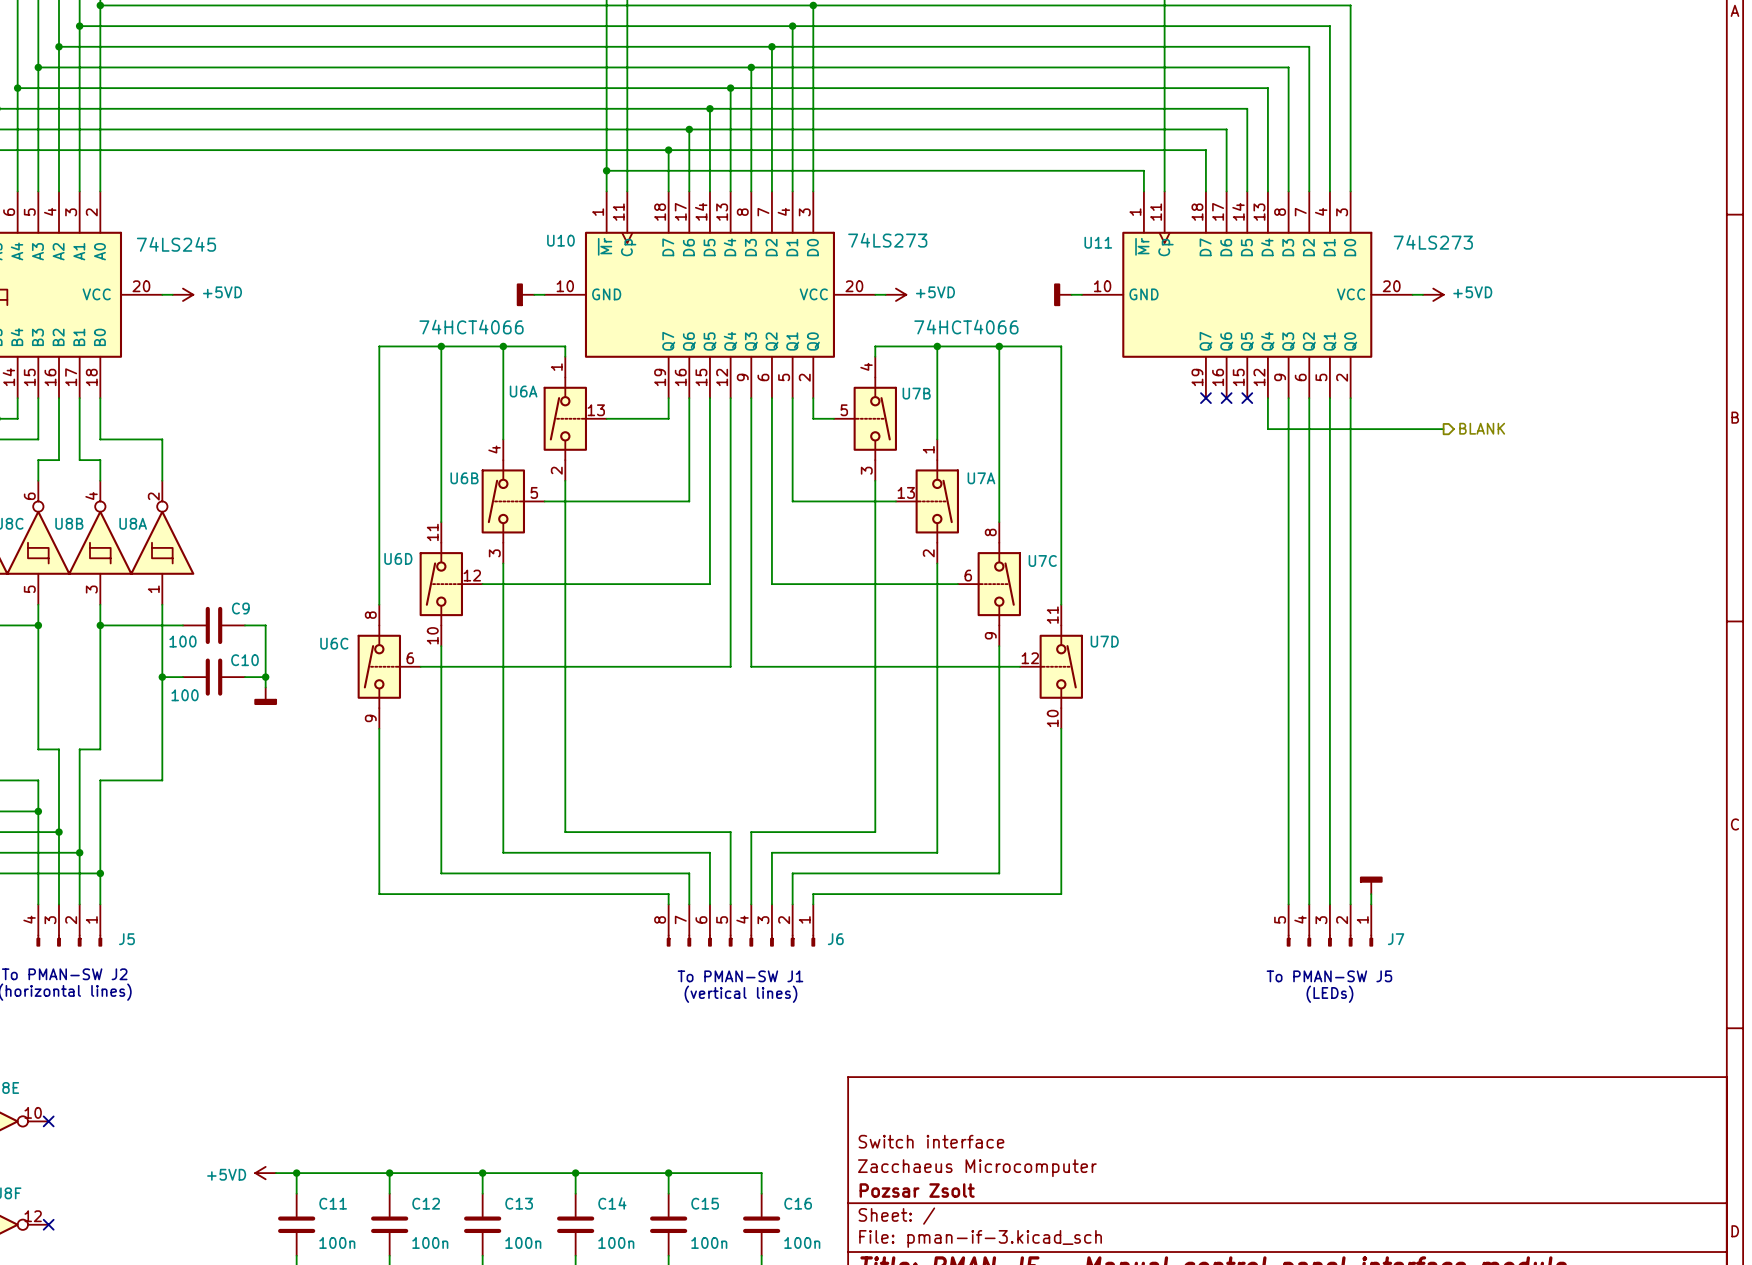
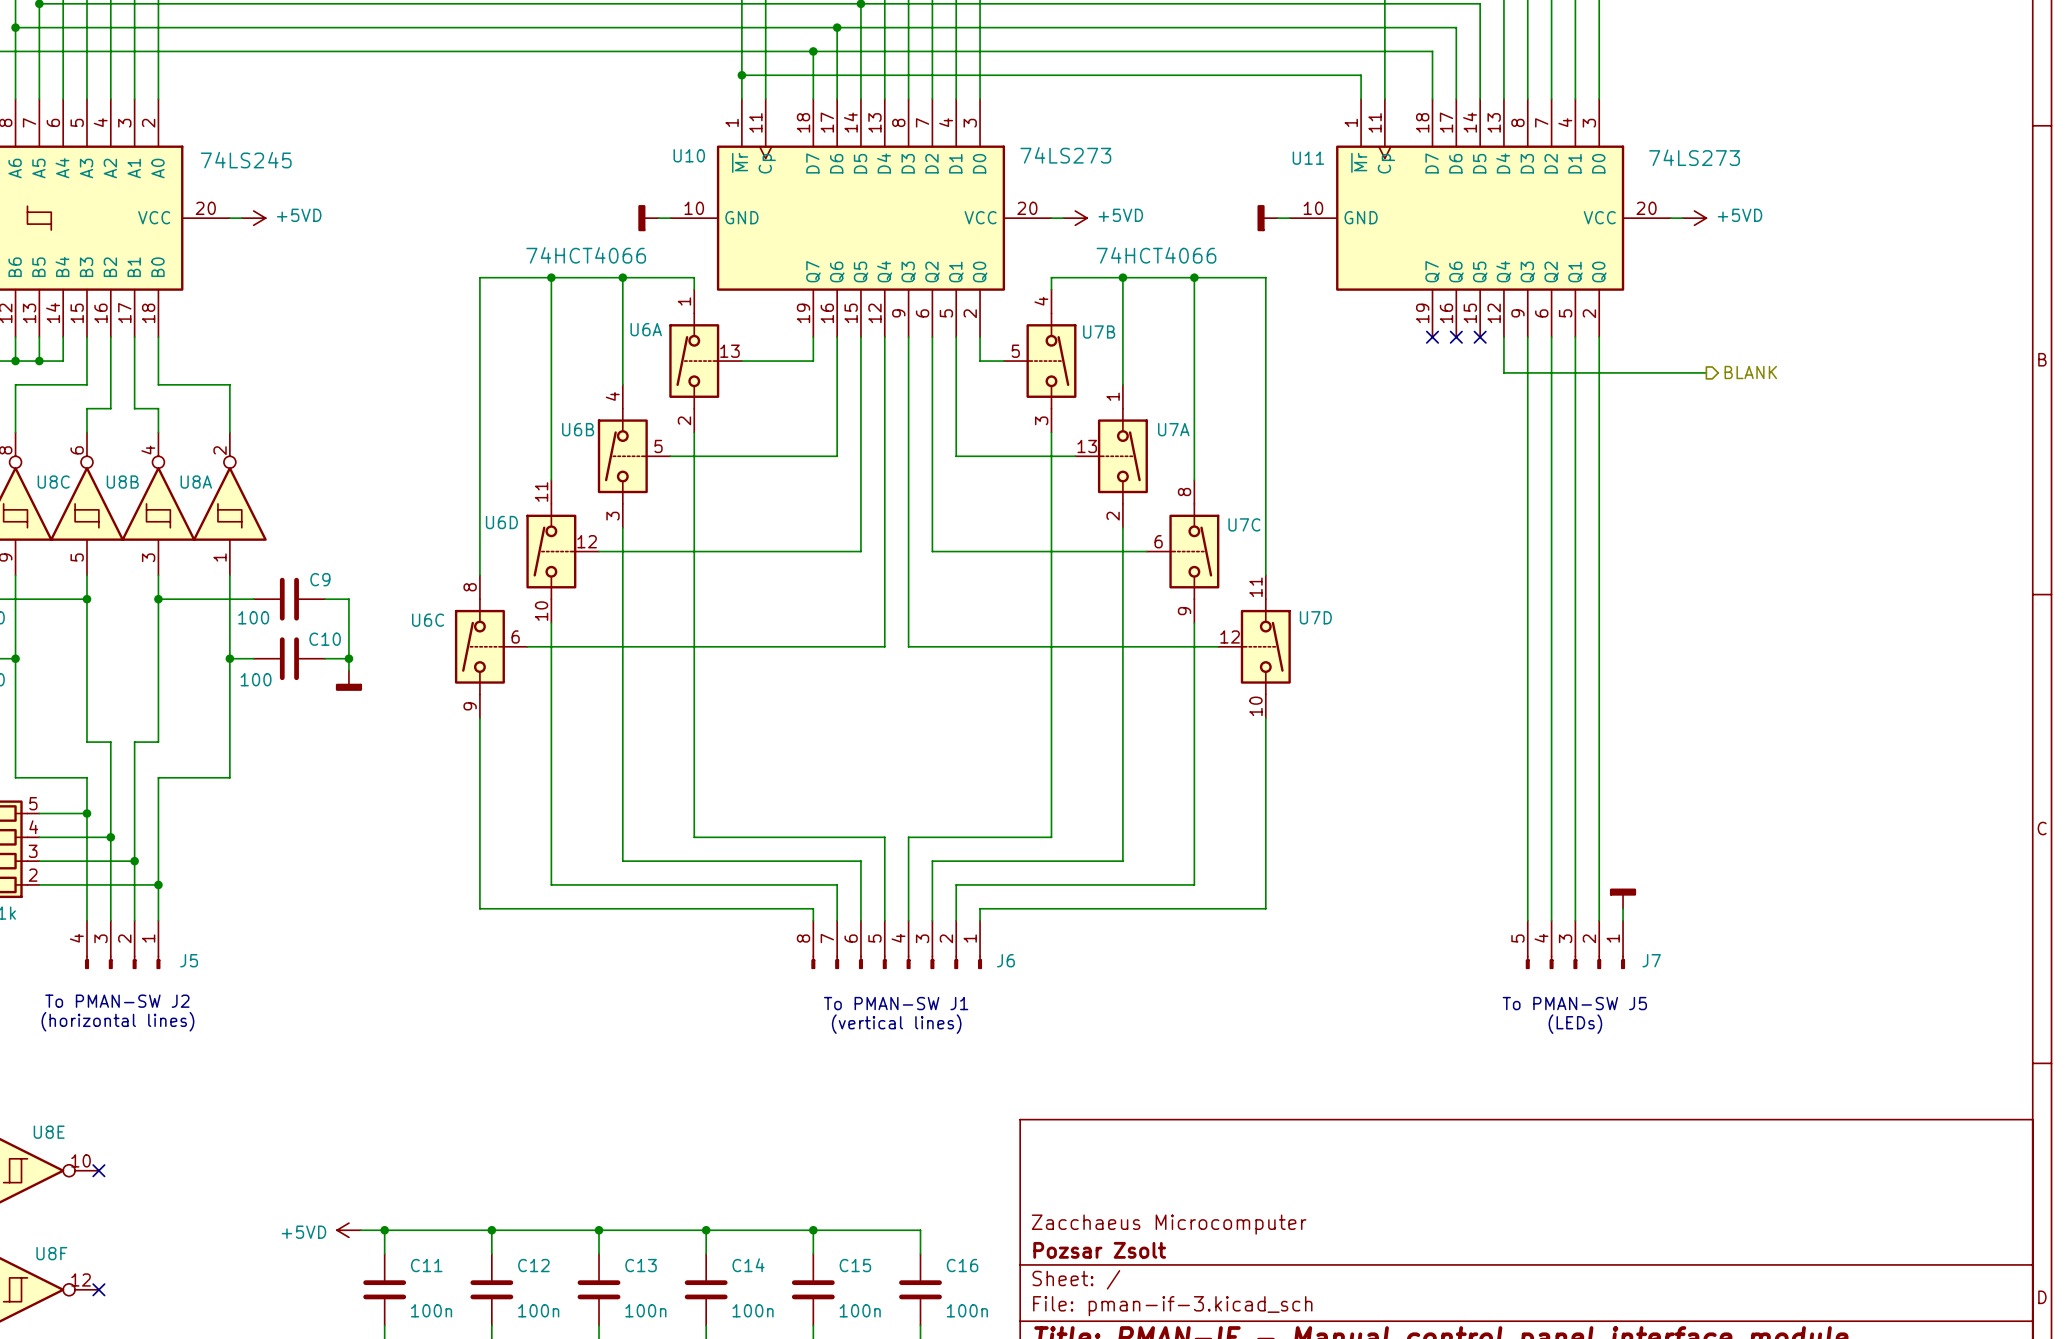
title block: Switch interface (931, 1141) -> none

